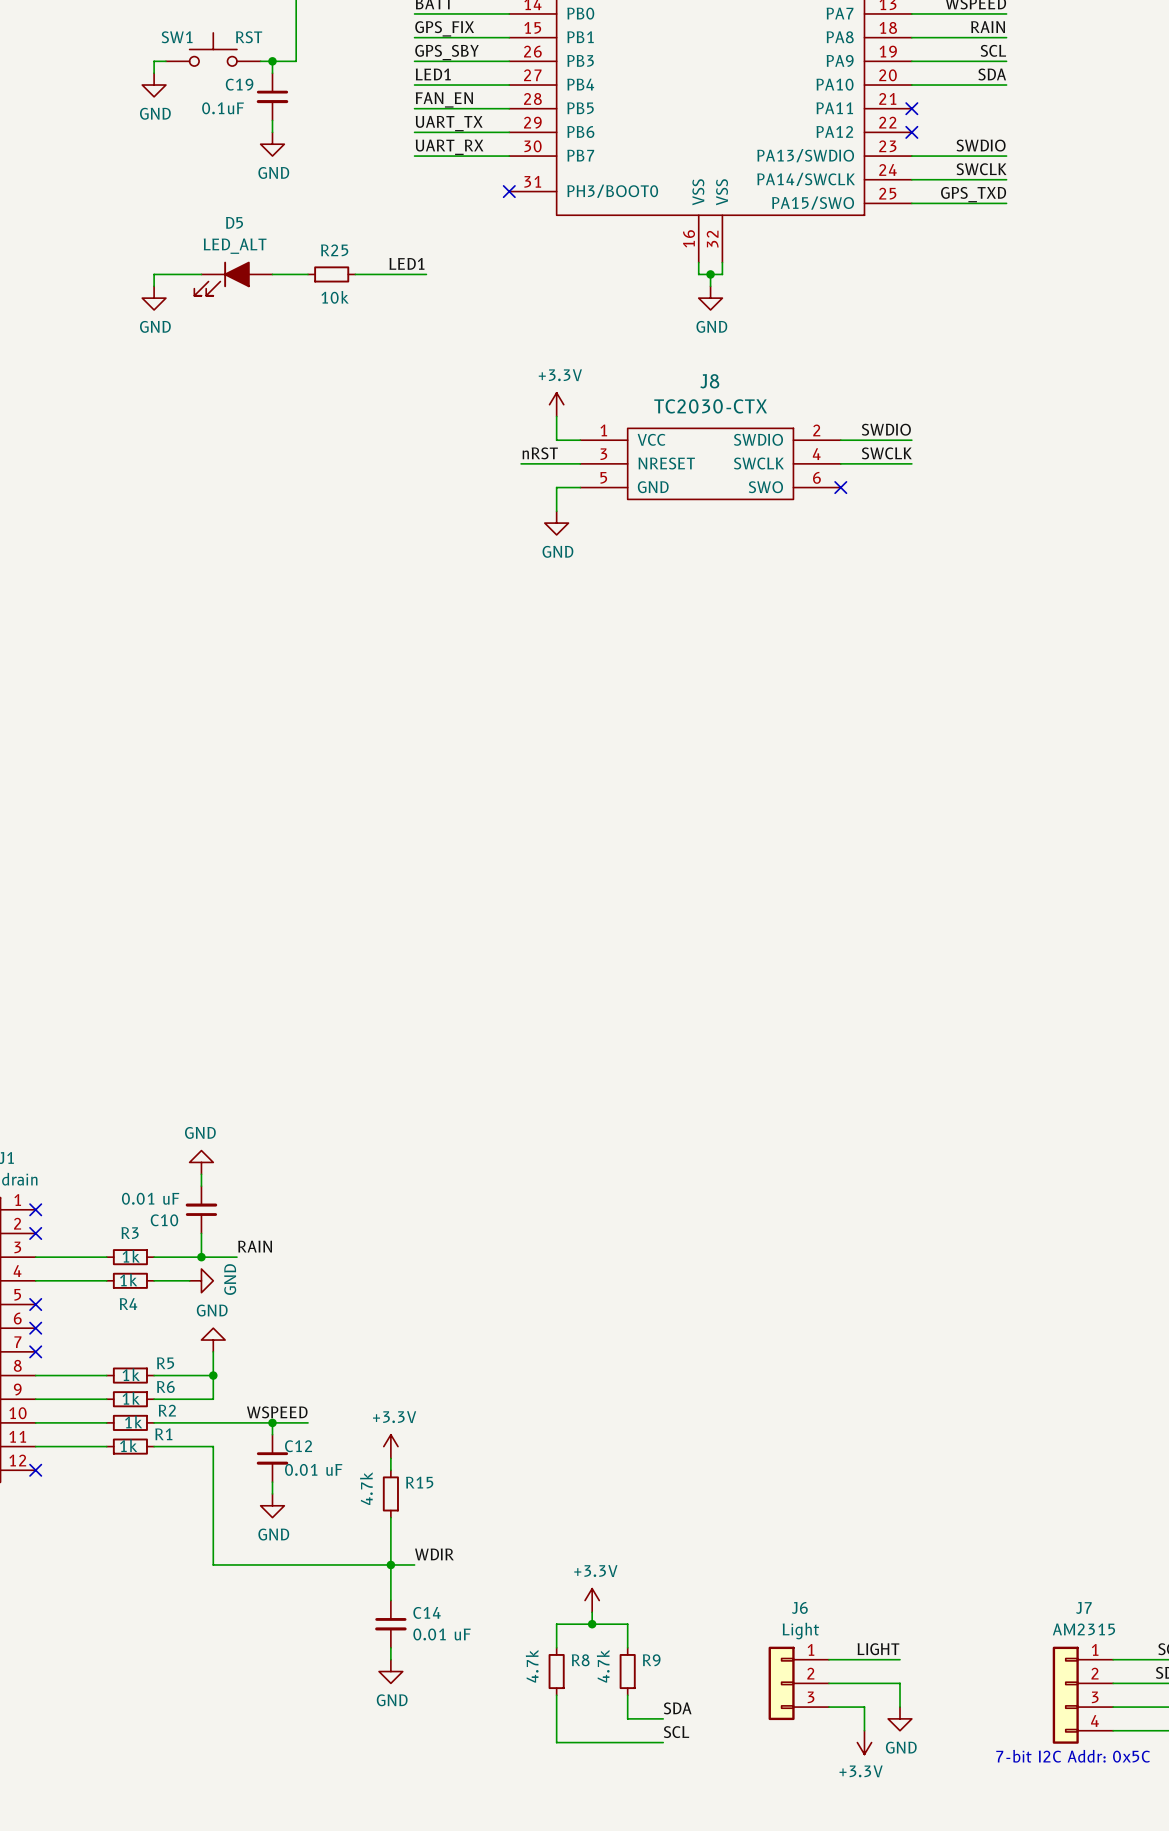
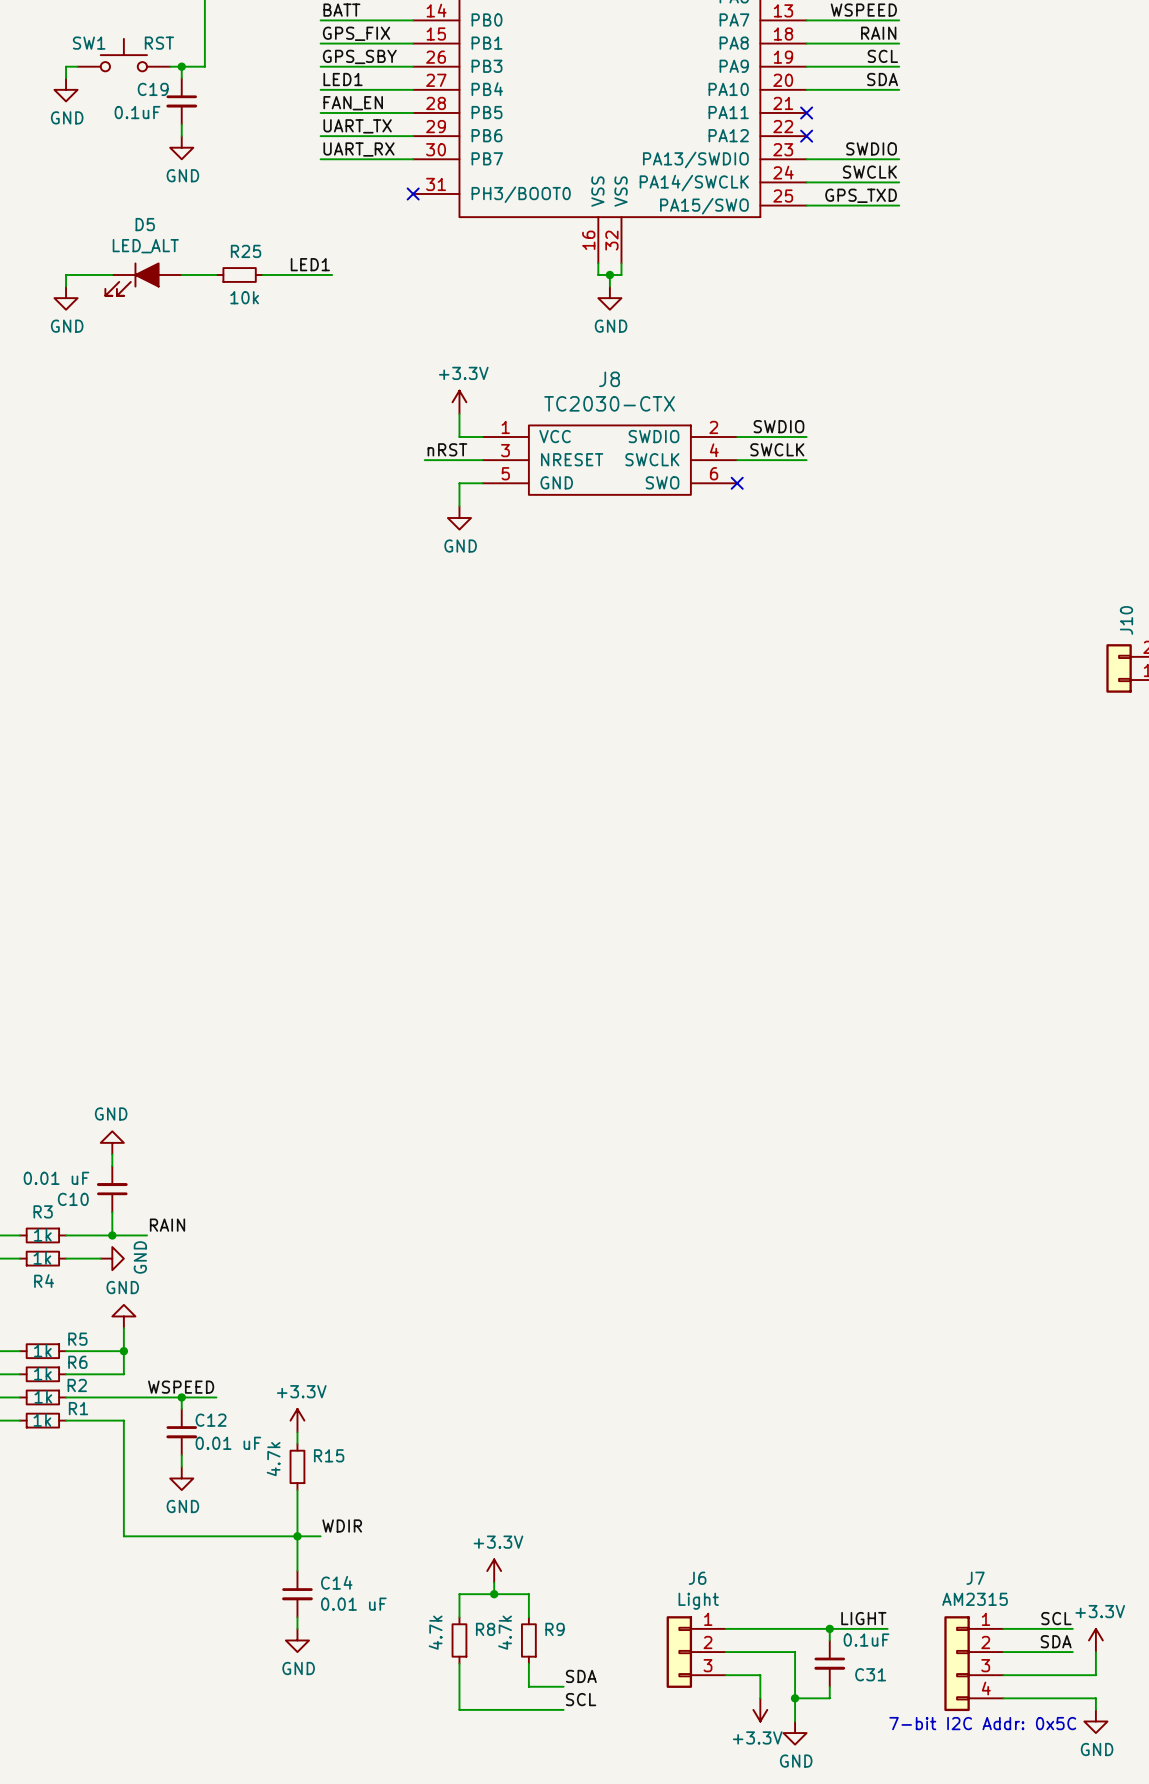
label position: LIGHT (878, 1649) -> LIGHT (863, 1618)
wire: none -> (795, 1628) (887, 1628)
wire: none -> (829, 1628) (829, 1640)
junction: none -> (829, 1628)
C31: none -> 0.1uF (829, 1663)
wire: none -> (795, 1675) (795, 1721)
power symbol position: GND (900, 1718) -> GND (795, 1733)
wire: none -> (829, 1686) (829, 1698) (795, 1698)
junction: none -> (795, 1698)

